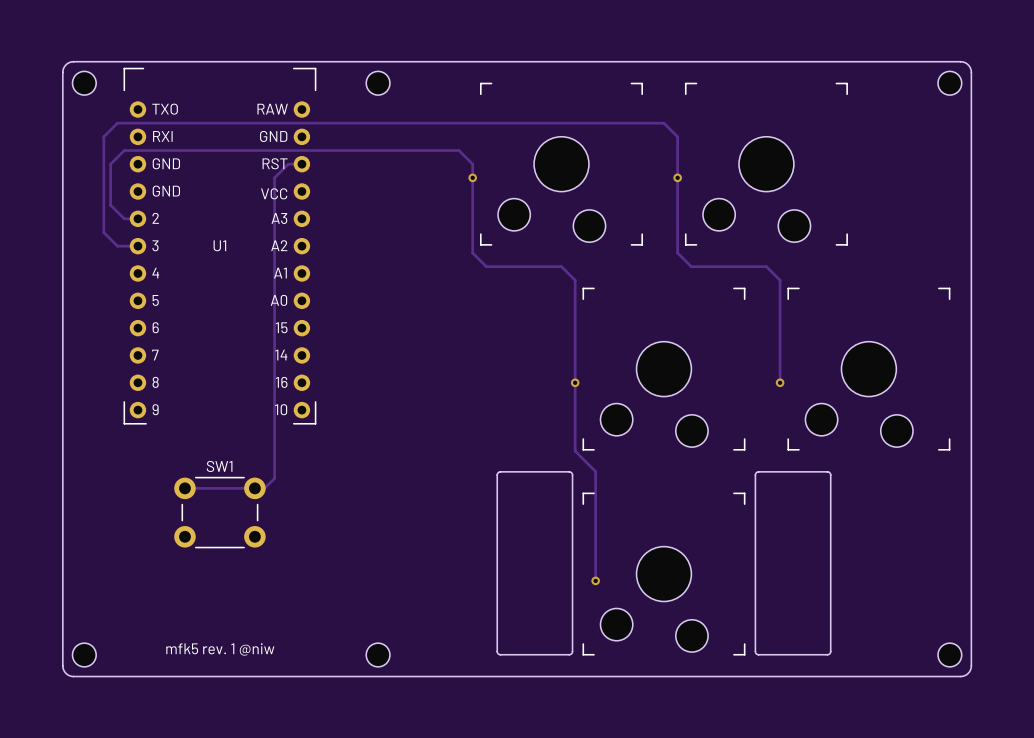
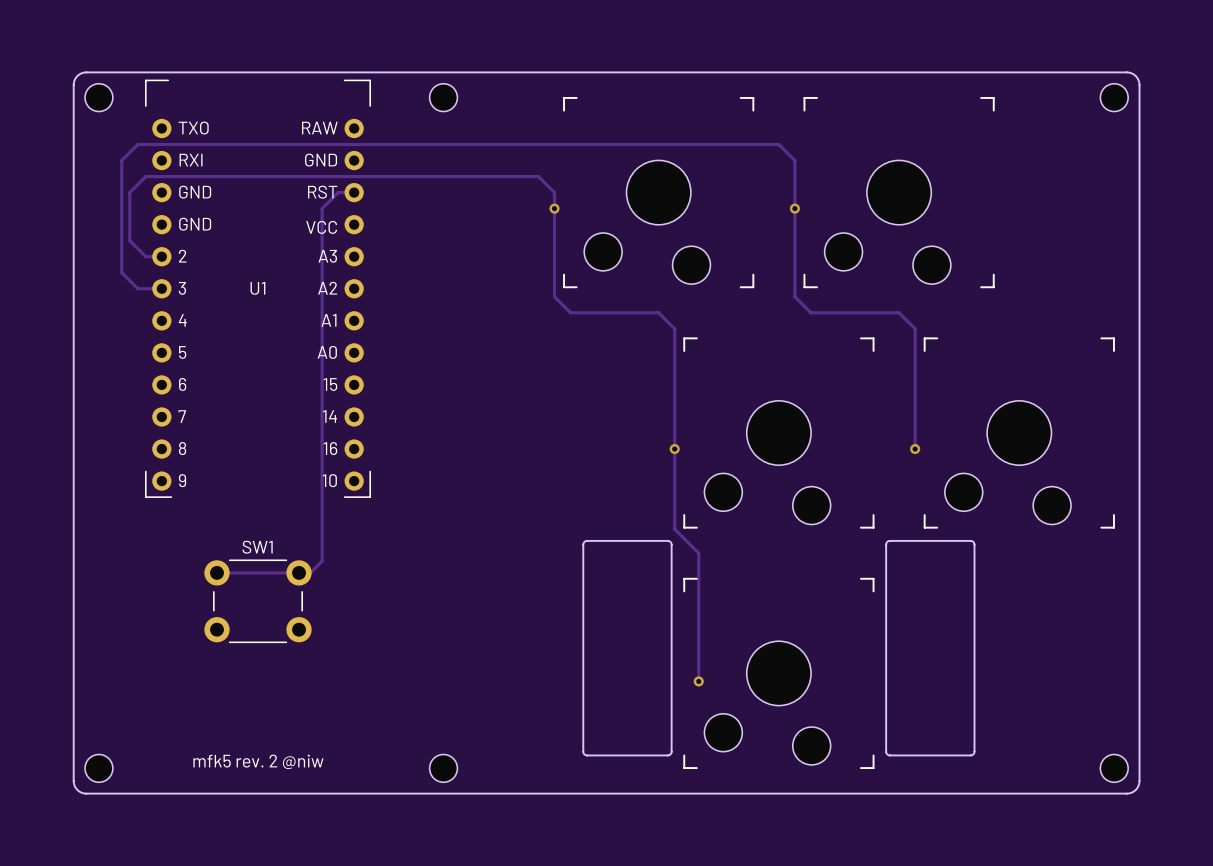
part footprint: [496, 471, 832, 656] -> [582, 539, 976, 770]
text: mfk5 rev. 1 @niw (220, 649) -> mfk5 rev. 2 @niw (258, 761)

